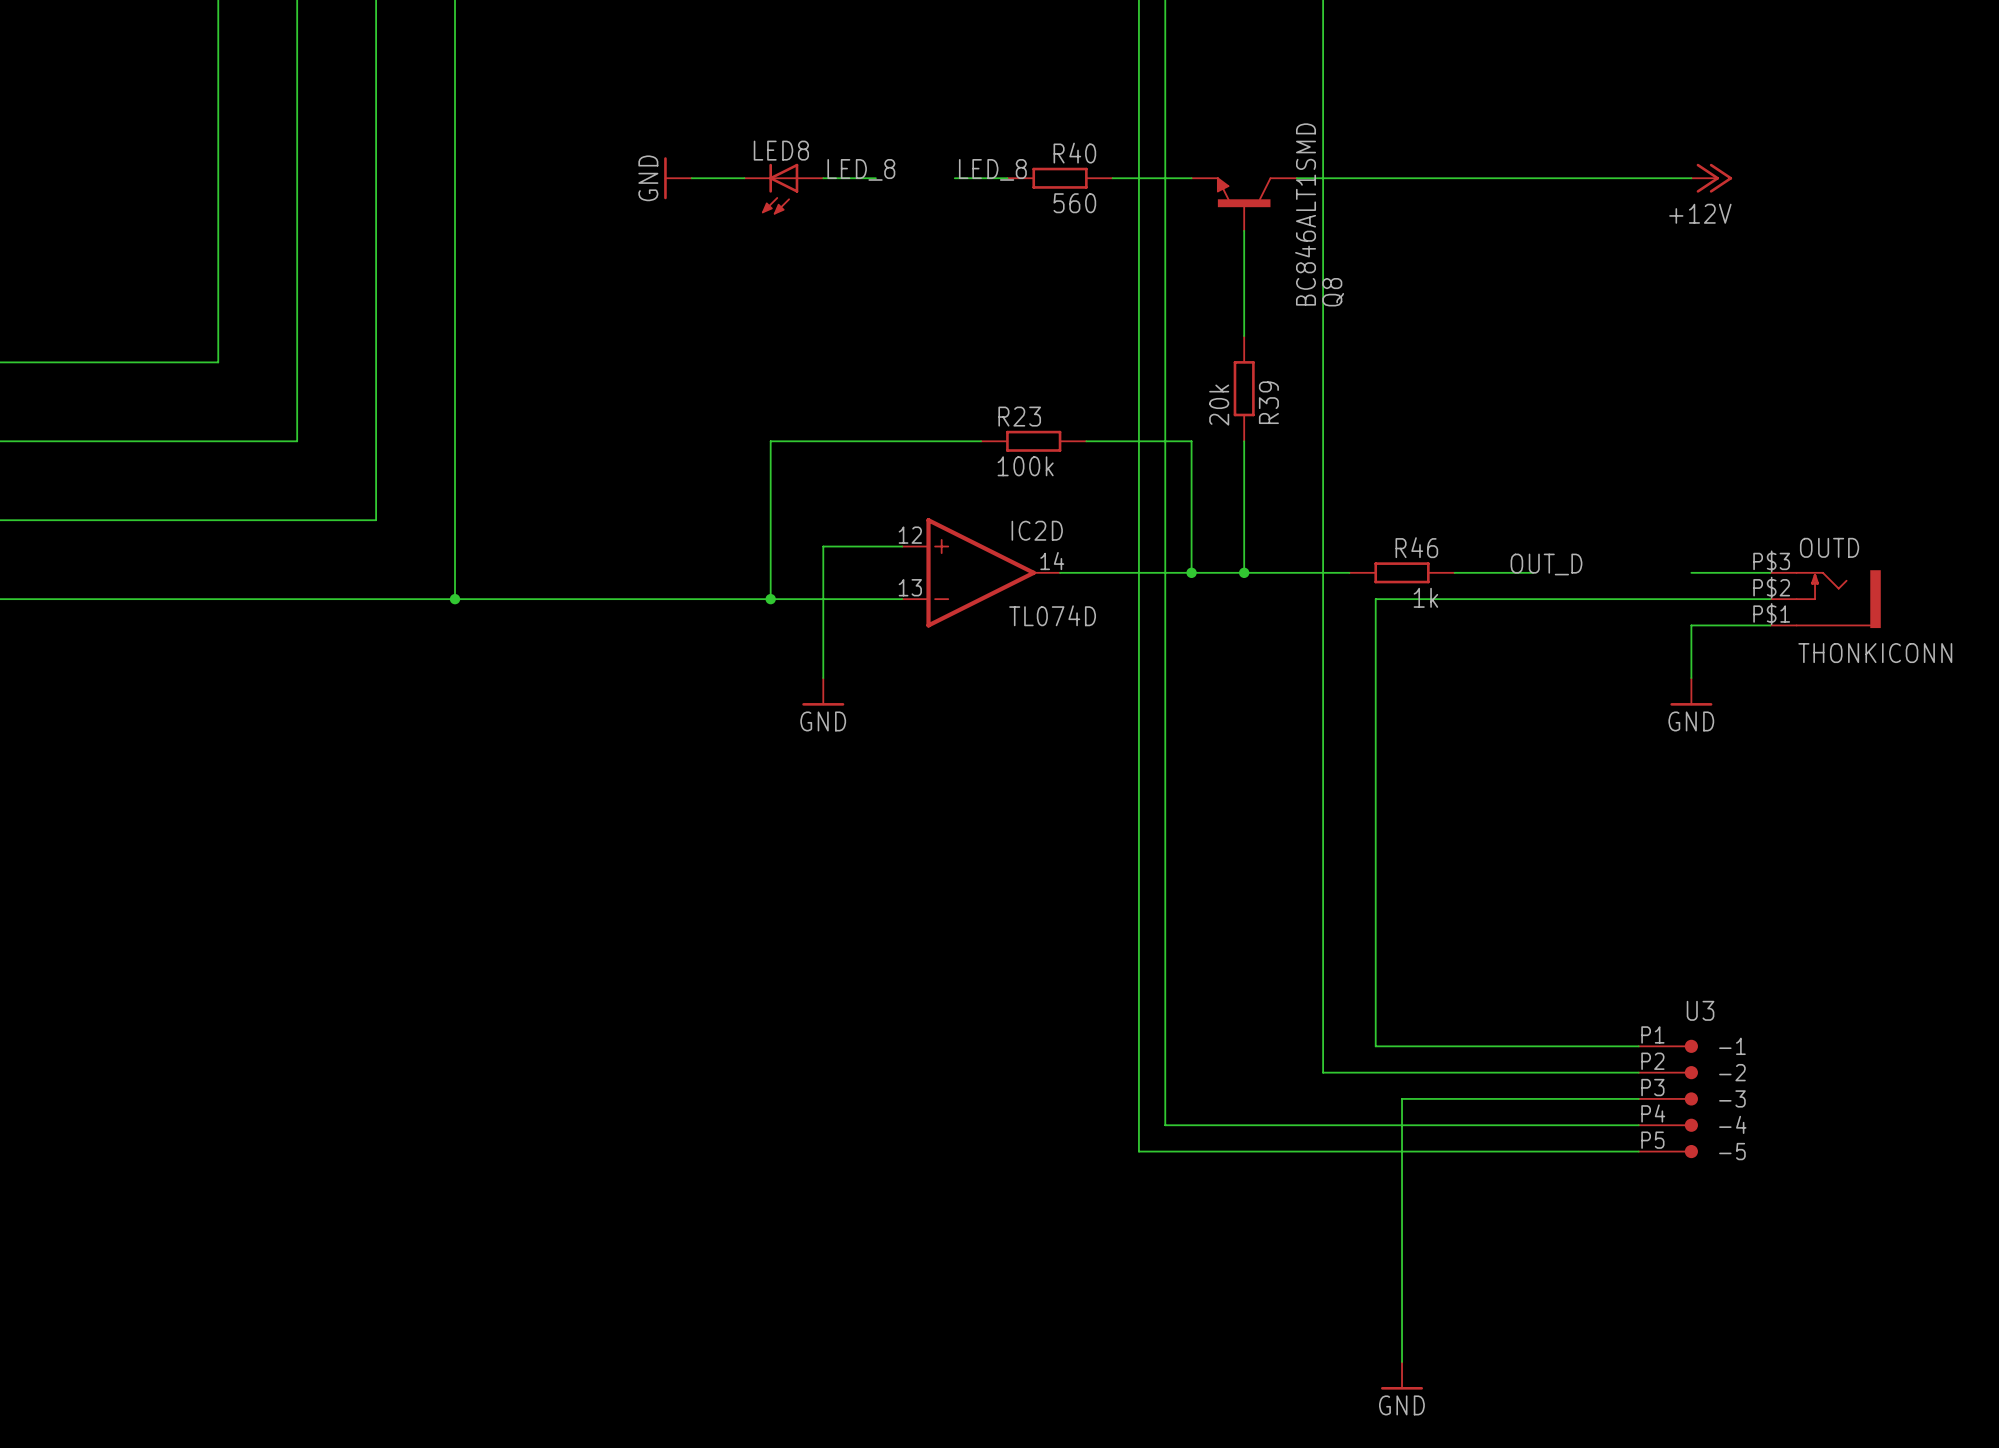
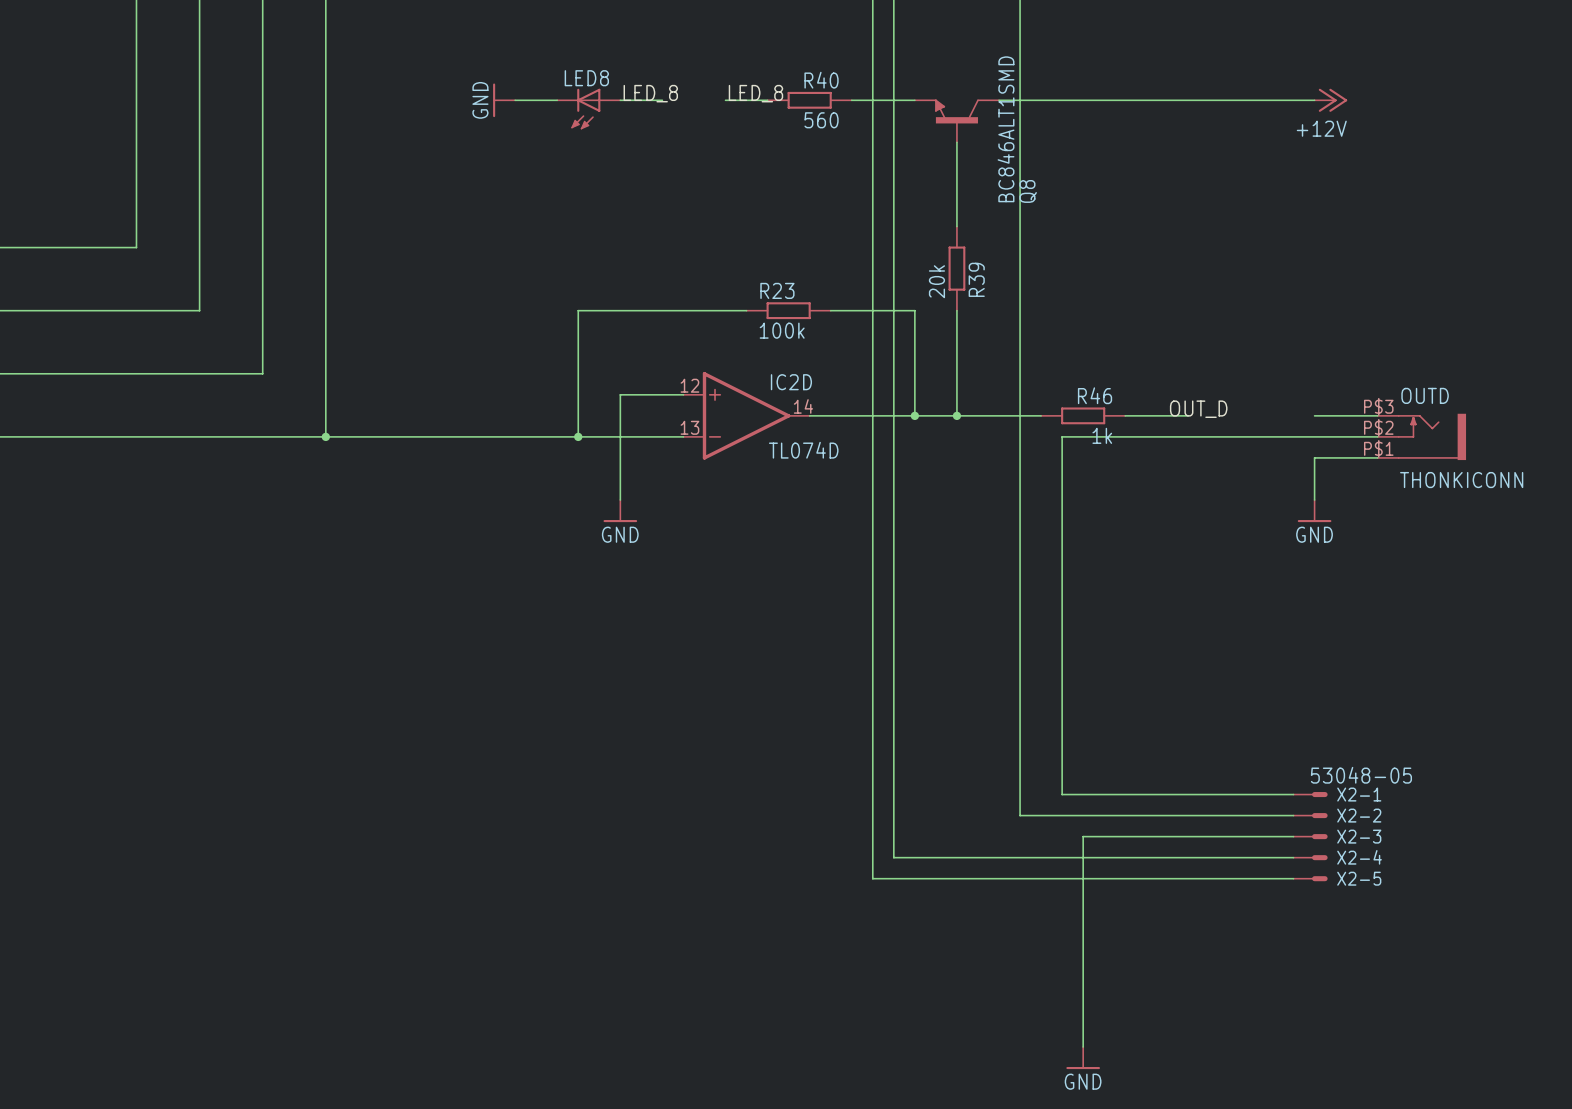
X2-1: none -> 53048-05 (1310, 794)
X2-2: none -> (1310, 815)
U3: (1668, 1098) -> none
X2-3: none -> (1310, 836)
X2-4: none -> (1310, 857)
X2-5: none -> (1310, 878)

